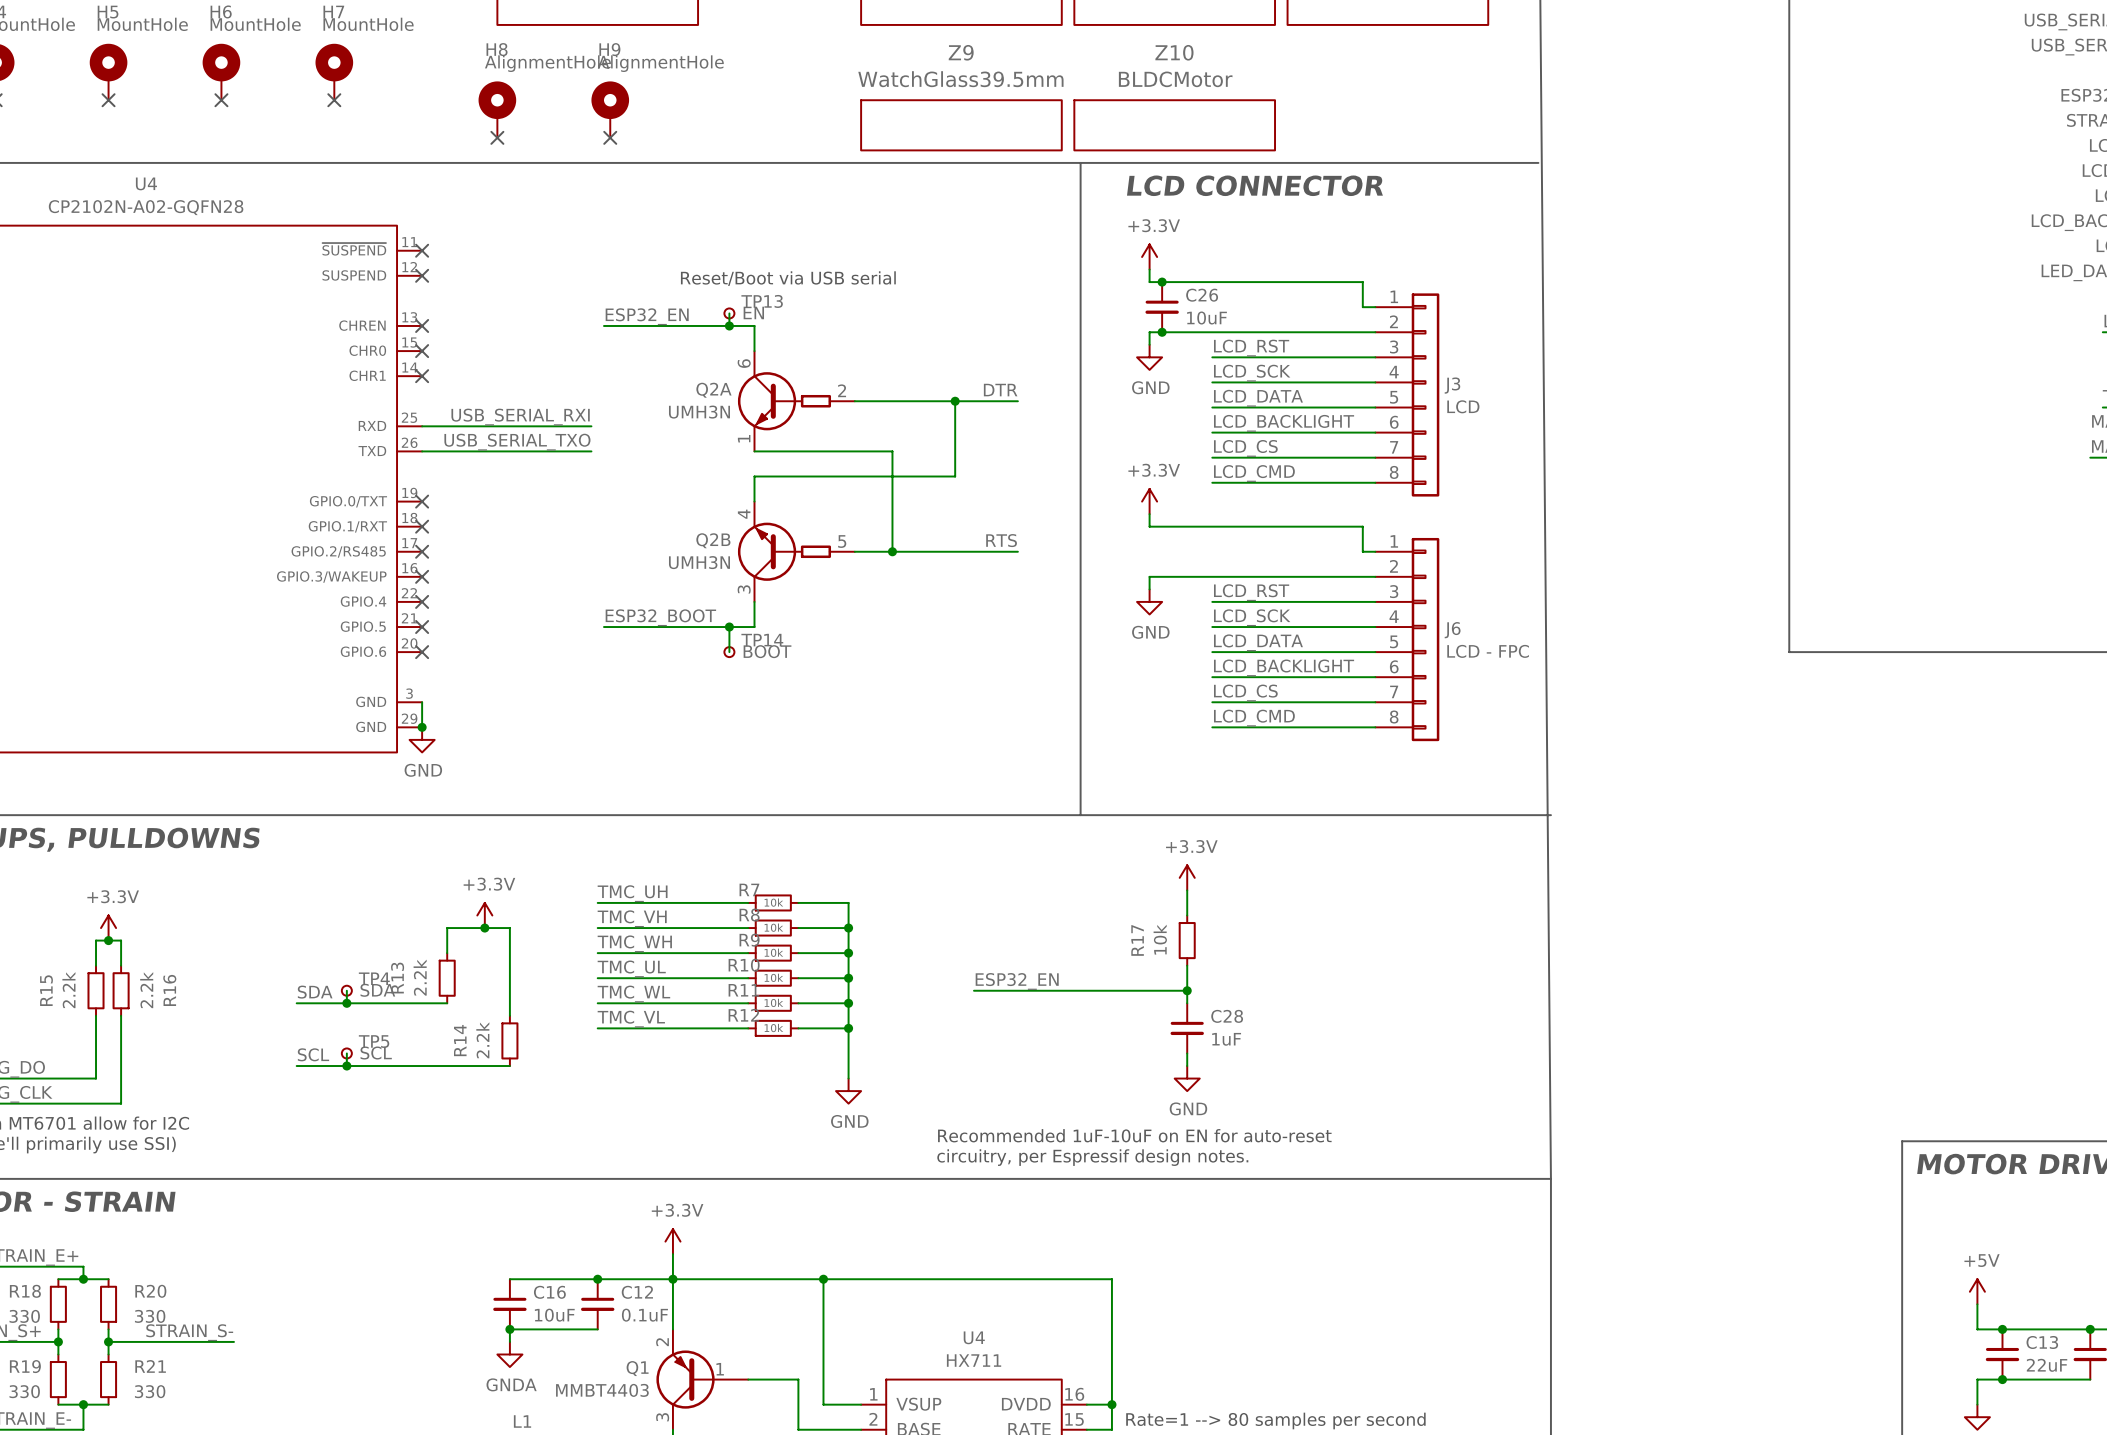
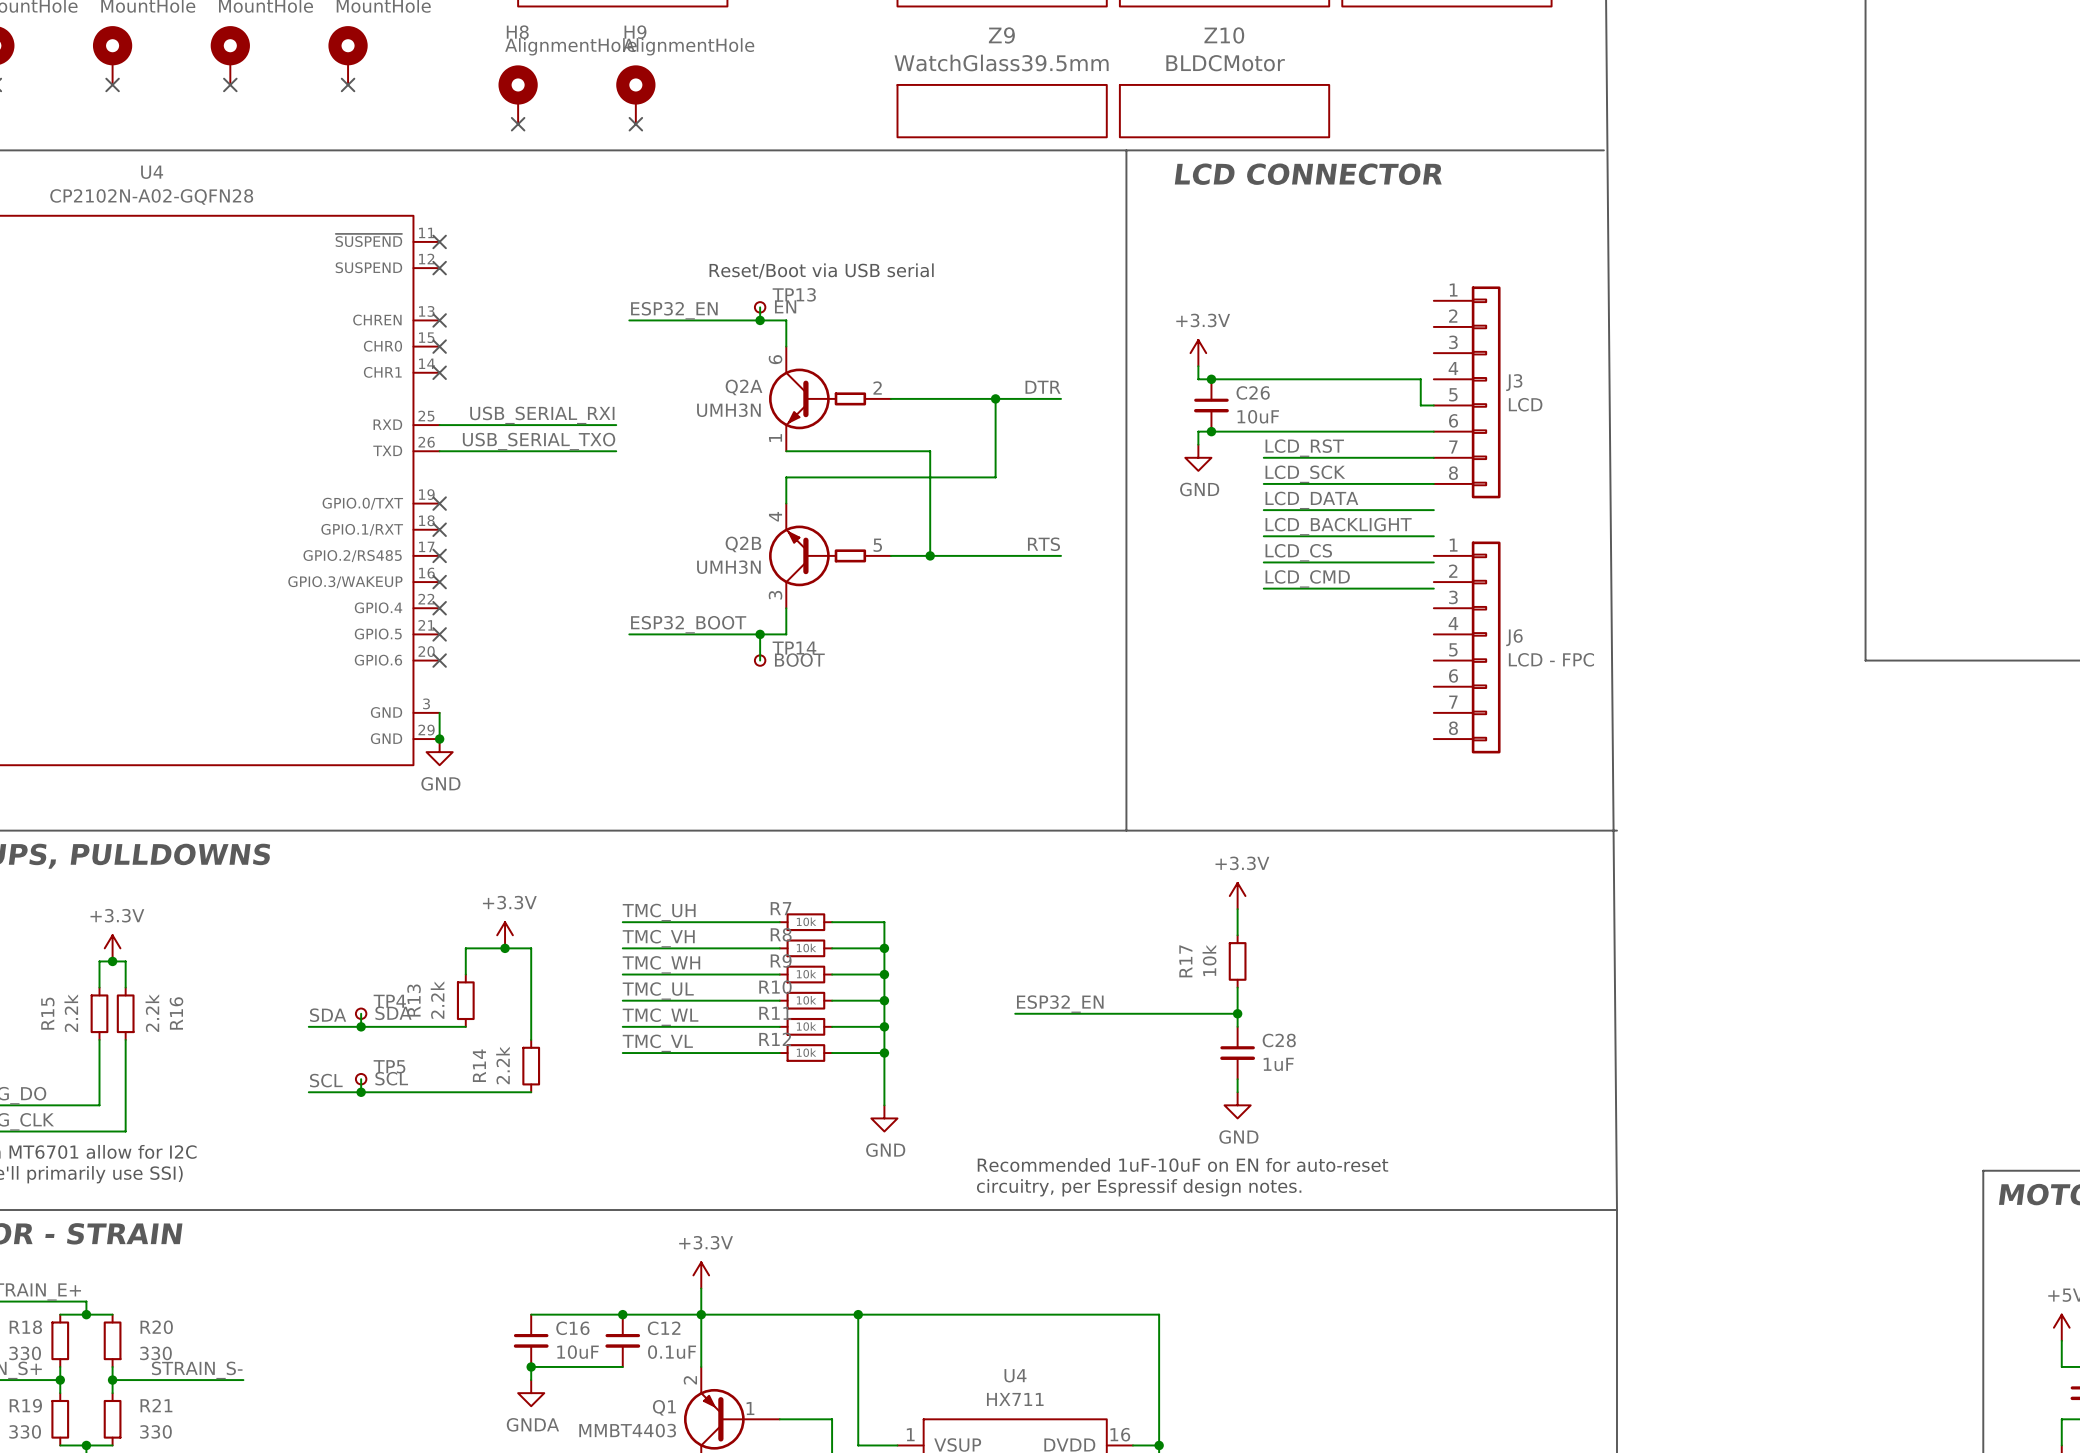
power symbol: +3.3V (1149, 257) -> none
wire: (1149, 269) (1149, 282) (1362, 282) (1362, 307) (1375, 307) -> none
junction: (1162, 282) -> none
C26 position: (1162, 307) -> (1211, 405)
junction: (1162, 332) -> none
wire: (1375, 332) (1149, 332) (1149, 344) -> none
label: LCD_RST (1251, 348) -> none
power symbol: GND (1149, 357) -> +3.3V (1198, 353)
wire: (1212, 357) (1375, 357) -> none
wire: none -> (1198, 366) (1198, 379) (1263, 379)
label: LCD_SCK (1252, 373) -> none
junction: none -> (1211, 379)
wire: (1362, 382) (1375, 382) -> (1420, 379) (1420, 405)
label: LCD_DATA (1258, 398) -> none
wire: (1212, 407) (1362, 407) -> none
label: LCD_BACKLIGHT (1284, 423) -> none
junction: none -> (1211, 431)
wire: none -> (1263, 431) (1198, 431) (1198, 444)
label: LCD_CS (1245, 448) -> LCD_RST (1304, 448)
label: LCD_CMD (1254, 473) -> LCD_SCK (1305, 474)
label: none -> LCD_DATA (1311, 500)
power symbol: +3.3V (1149, 501) -> none
wire: (1149, 514) (1149, 526) (1362, 526) (1362, 551) (1375, 551) -> none
label: none -> LCD_BACKLIGHT (1338, 526)
wire: (1375, 576) (1149, 576) (1149, 589) -> none
label: LCD_RST (1251, 592) -> none
power symbol position: GND (1149, 601) -> GND (1198, 457)
wire: (1212, 601) (1375, 601) -> (1263, 510) (1433, 510)
label: LCD_SCK (1252, 617) -> none
wire: (1212, 627) (1375, 627) -> (1263, 536) (1433, 536)
label: LCD_DATA (1258, 642) -> none
wire: (1212, 652) (1375, 652) -> (1263, 562) (1433, 562)
label: LCD_BACKLIGHT (1284, 667) -> none
wire: (1212, 677) (1375, 677) -> (1263, 588) (1433, 588)
label position: LCD_CS (1245, 692) -> LCD_CS (1298, 552)
wire: (1212, 702) (1375, 702) -> none
label position: LCD_CMD (1254, 718) -> LCD_CMD (1307, 578)
wire: (1212, 727) (1375, 727) -> none

